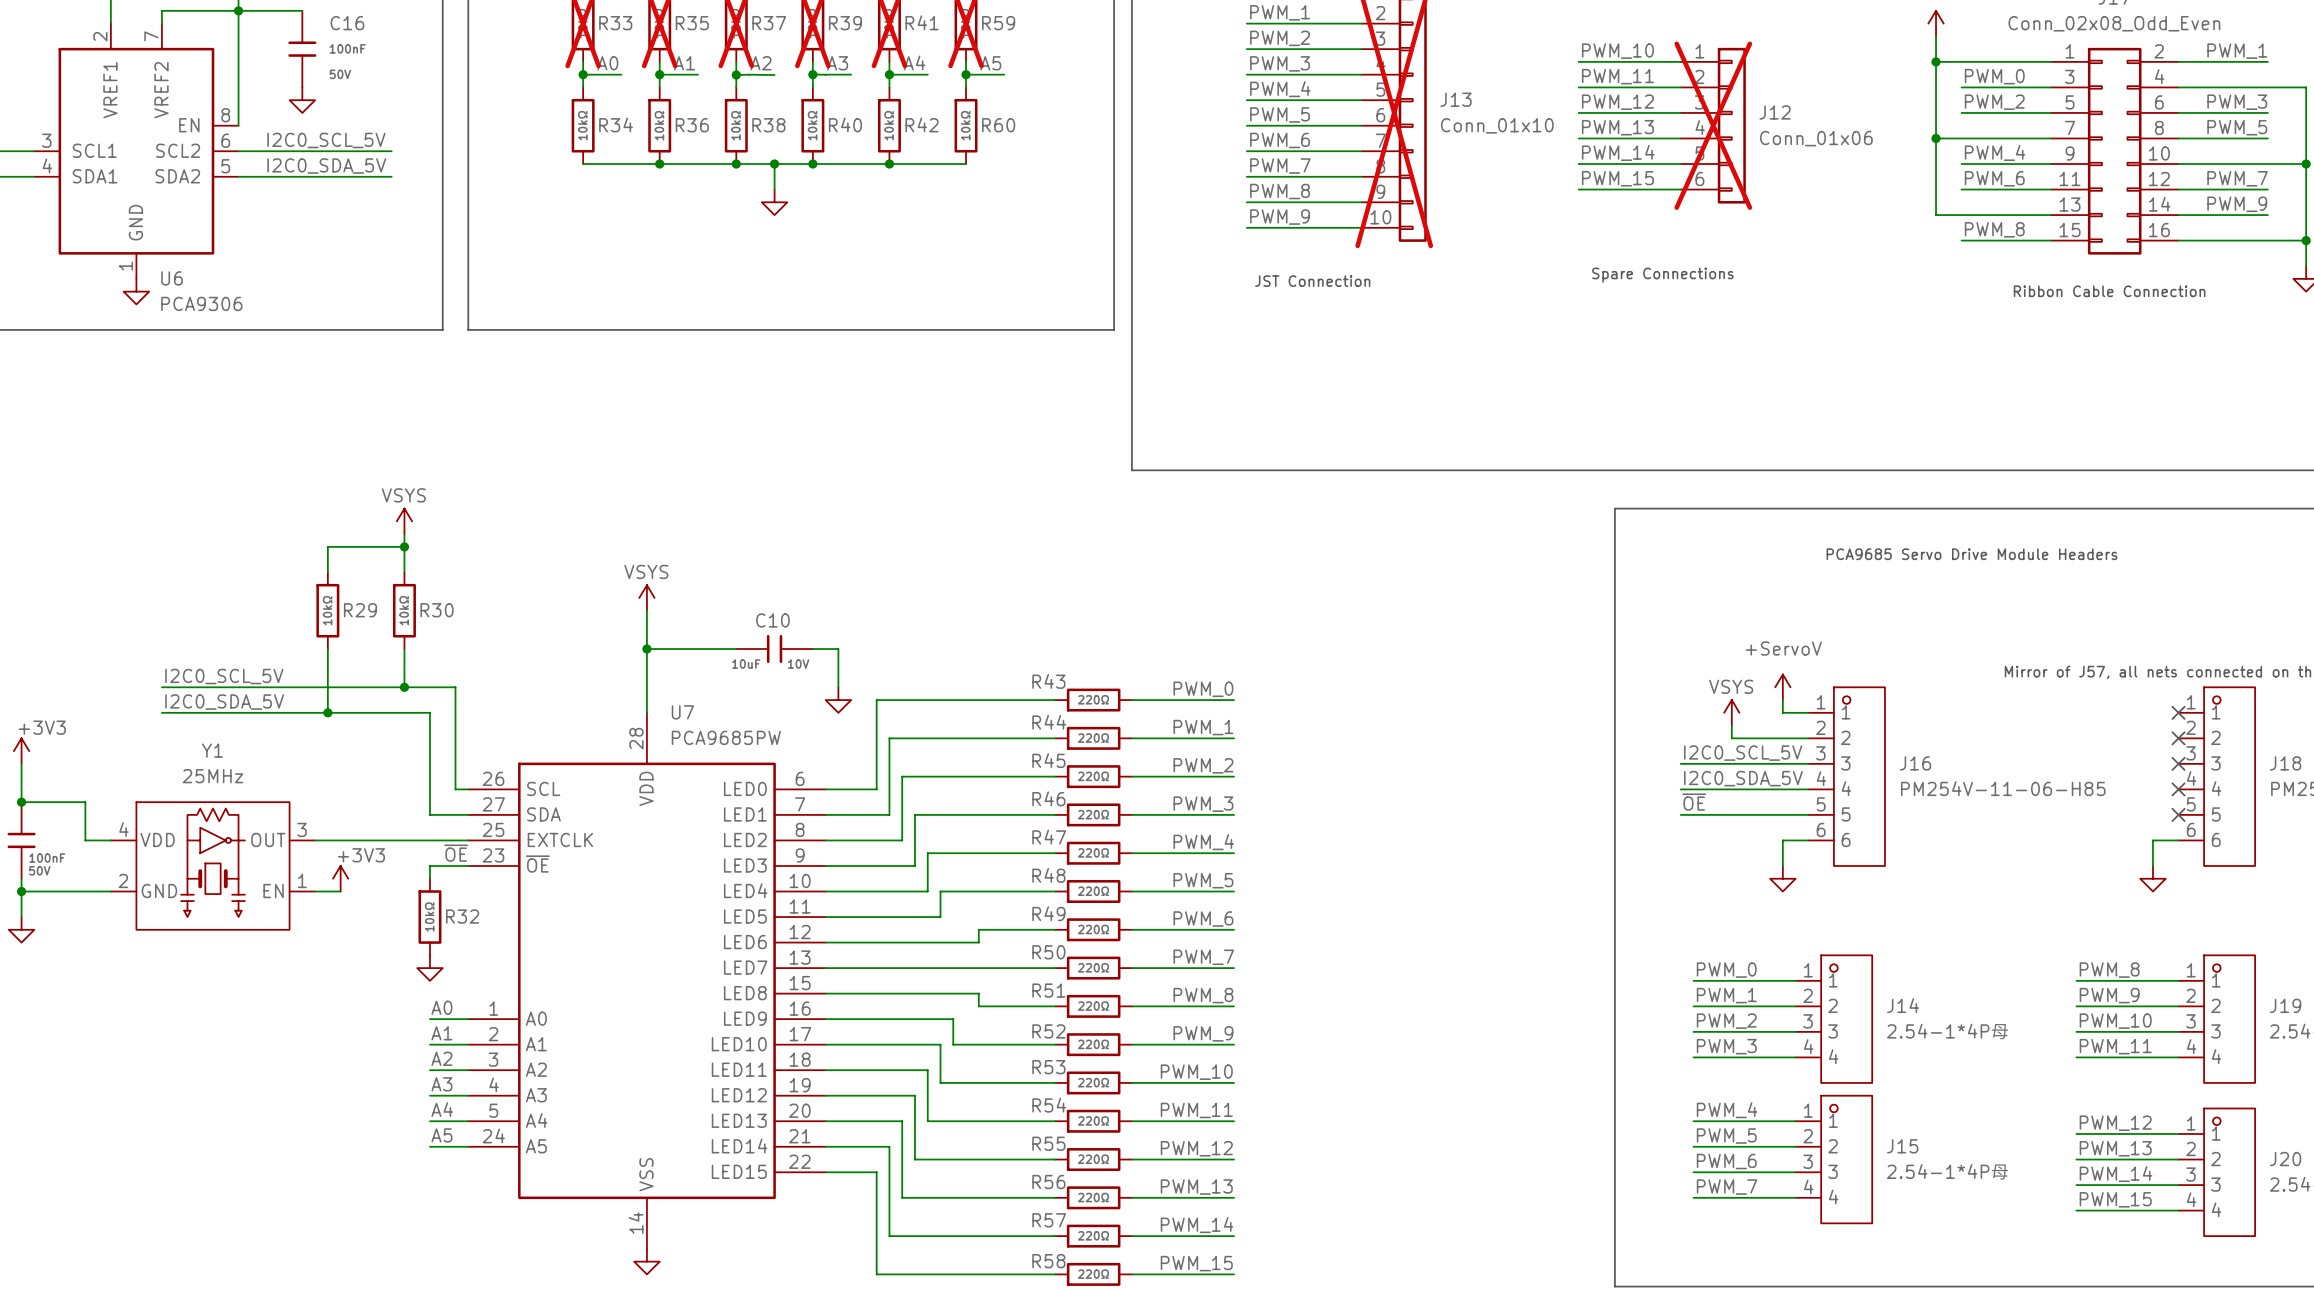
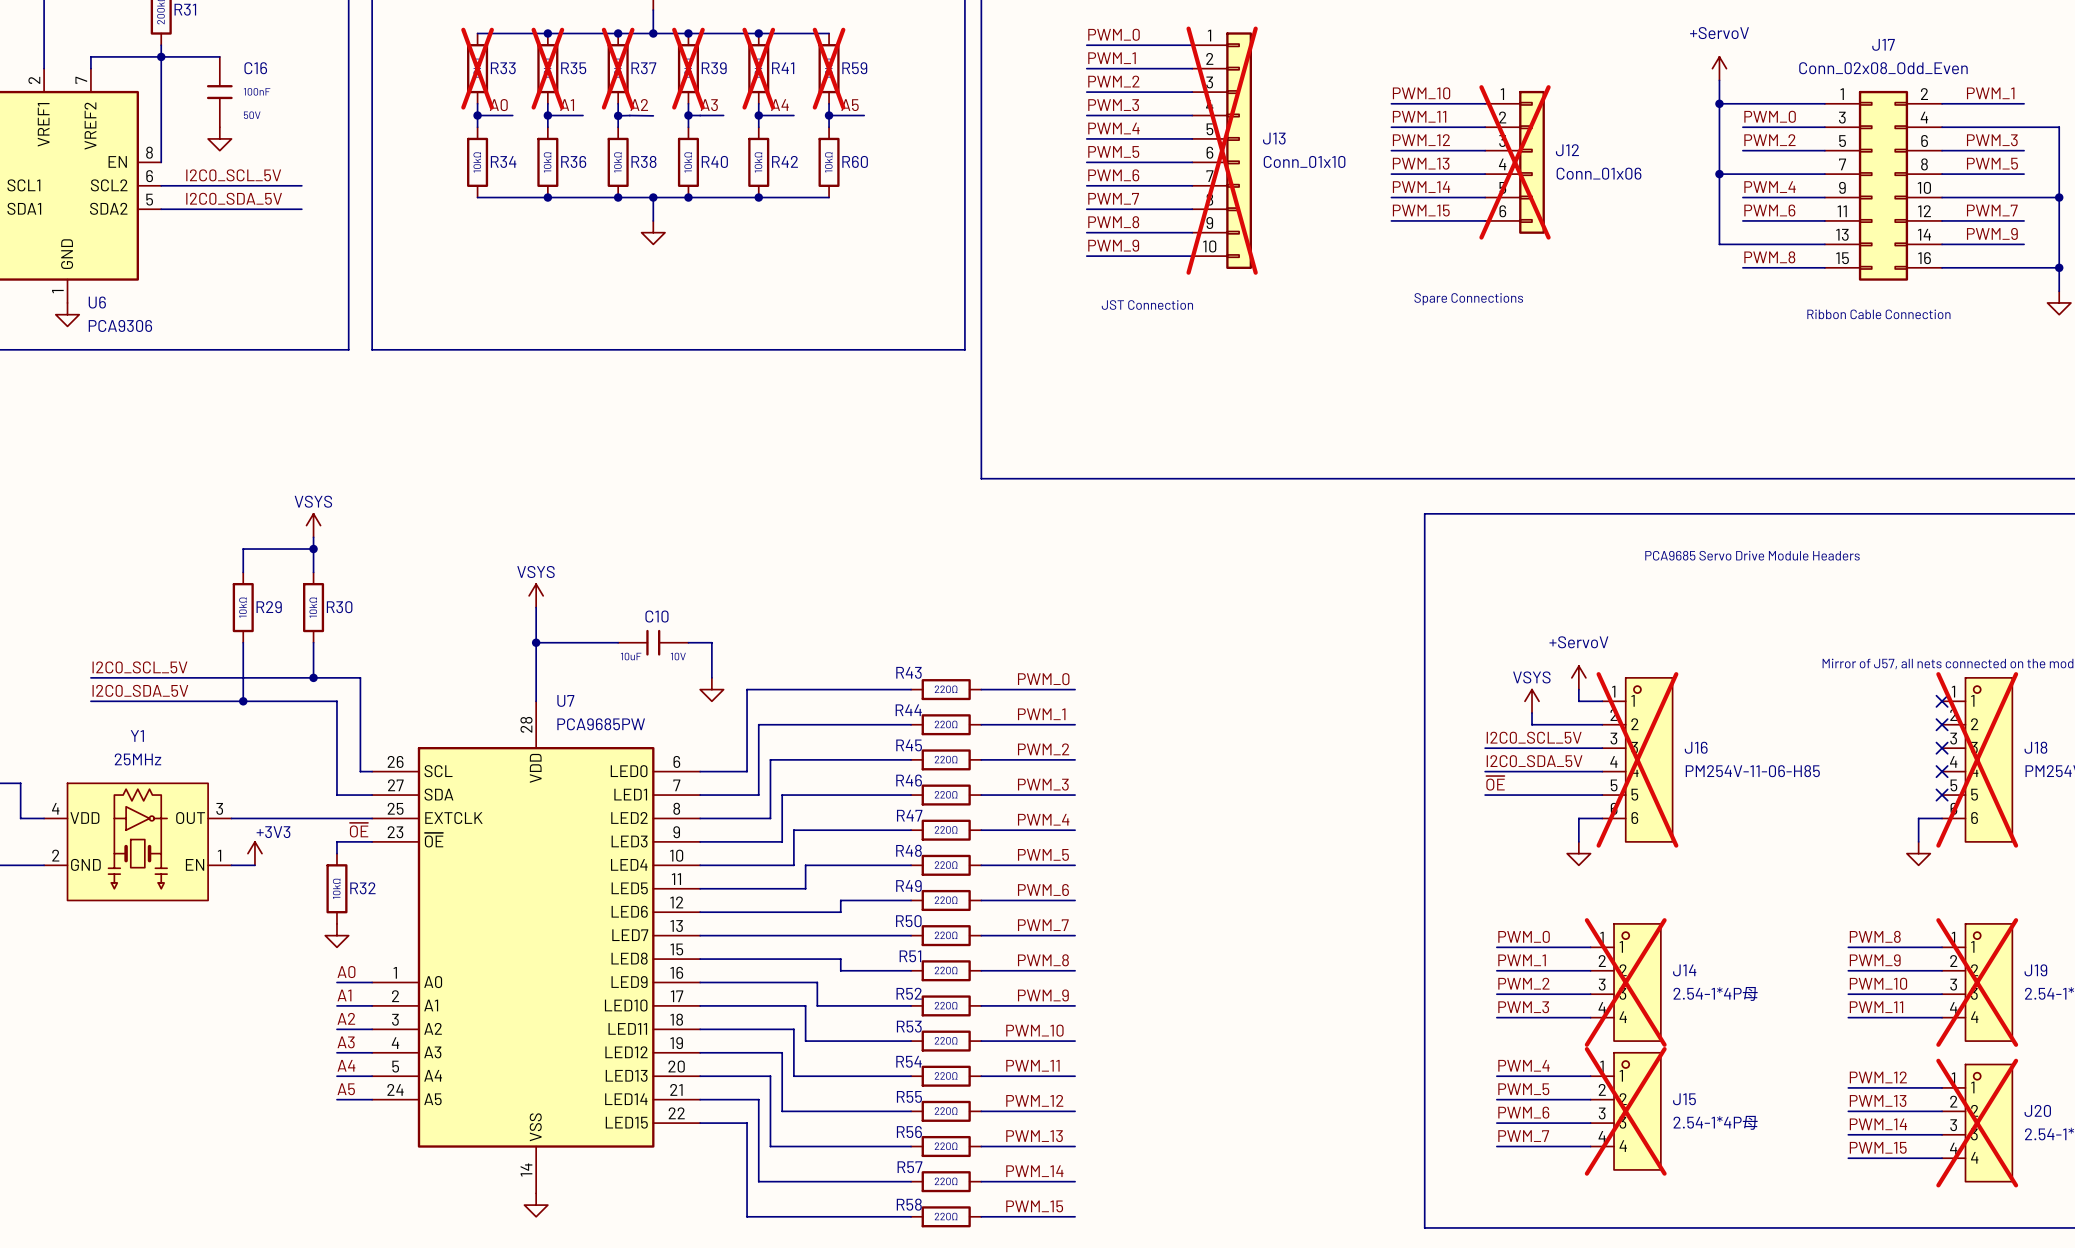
J16 do-not-place cross: none -> (1637, 759)
J18 do-not-place cross: none -> (1977, 759)
J14 do-not-place cross: none -> (1625, 982)
J19 do-not-place cross: none -> (1977, 982)
J15 do-not-place cross: none -> (1625, 1111)
J20 do-not-place cross: none -> (1977, 1123)

